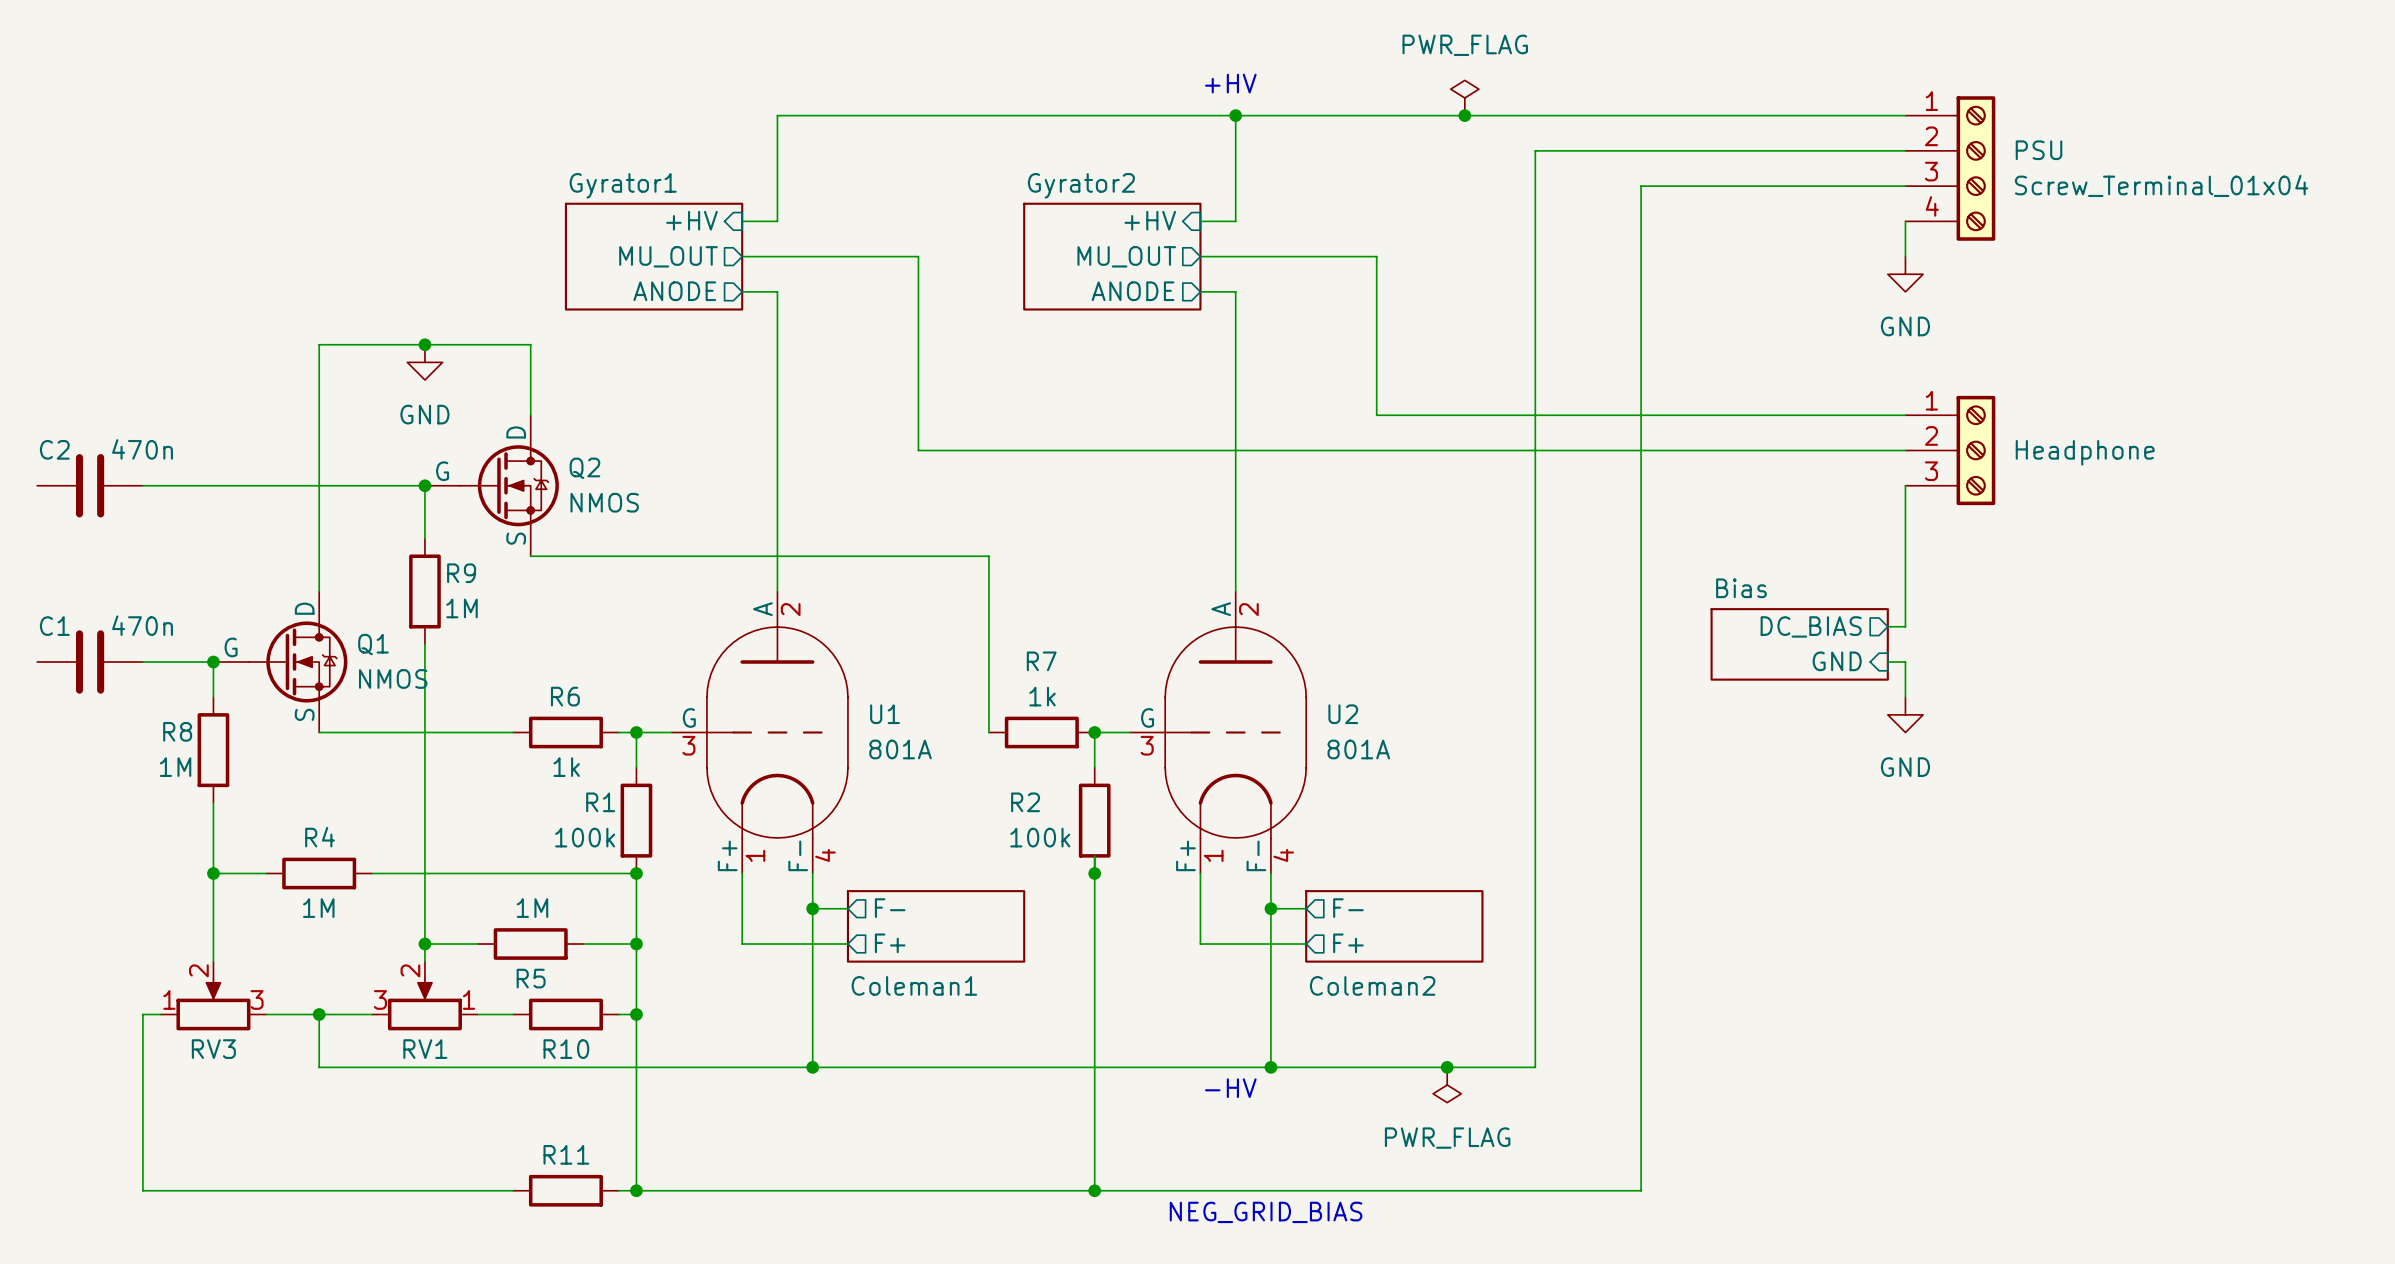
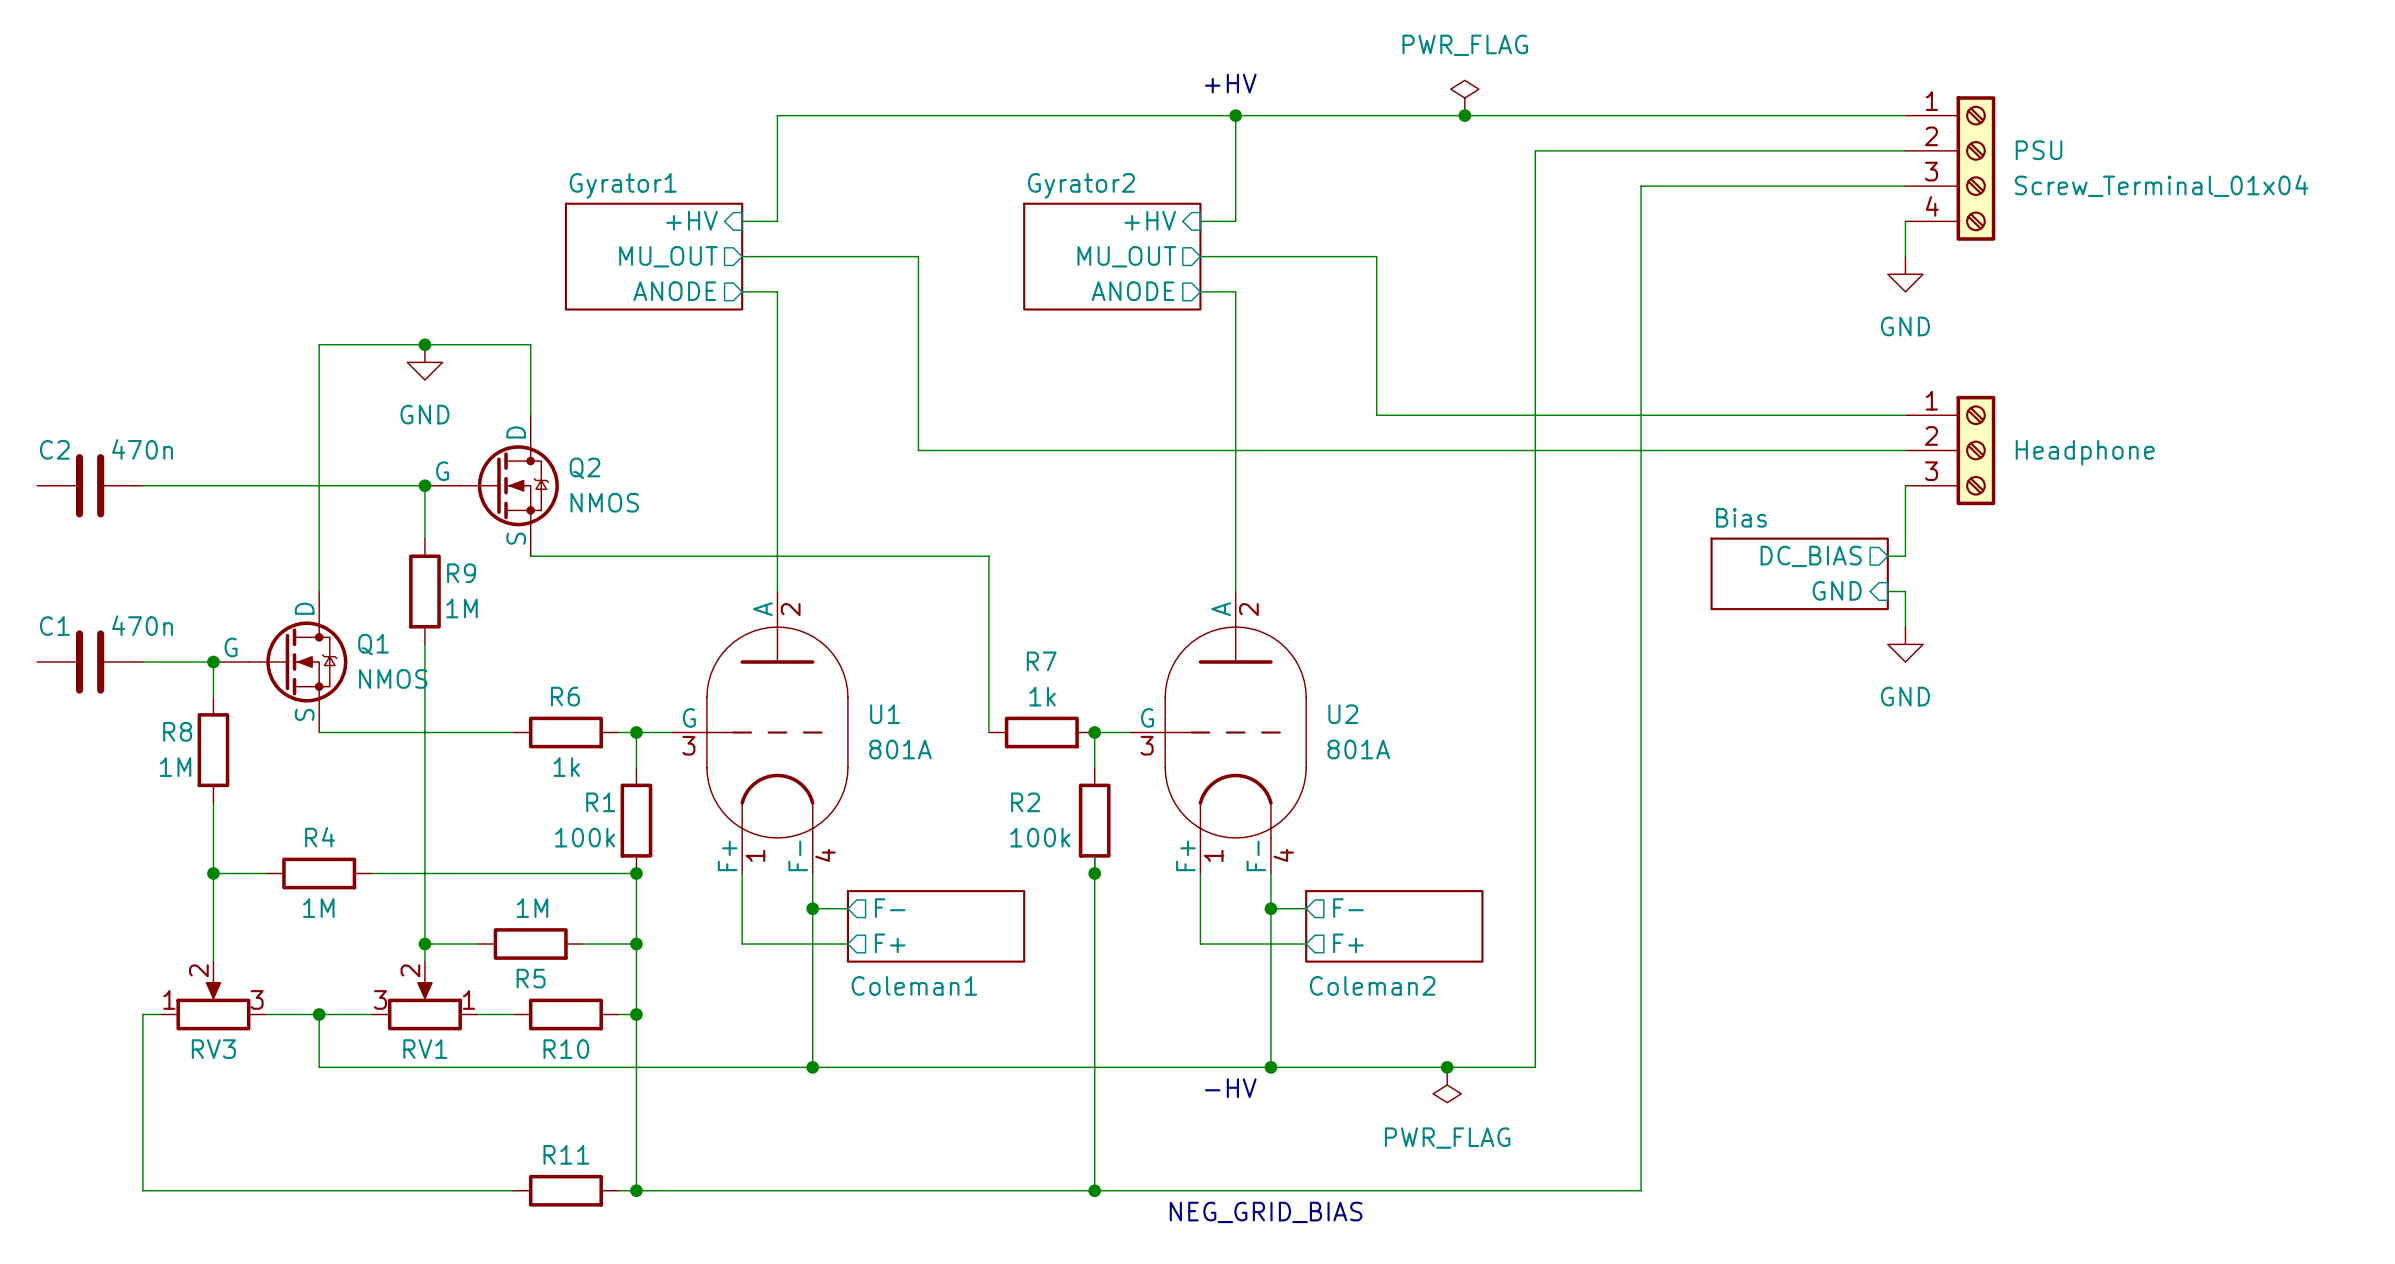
wire: (1905, 556) (1905, 591) -> (1905, 556) (1887, 556)
sheet pin position: DC_BIAS (1811, 626) -> DC_BIAS (1811, 556)
wire: (1887, 626) (1905, 626) -> (1887, 591) (1905, 591)
sheet Bias position: (1799, 644) -> (1799, 573)
sheet pin position: GND (1837, 661) -> GND (1837, 590)
wire: (1887, 662) (1905, 662) (1905, 697) -> none
power symbol position: GND (1905, 714) -> GND (1905, 644)

